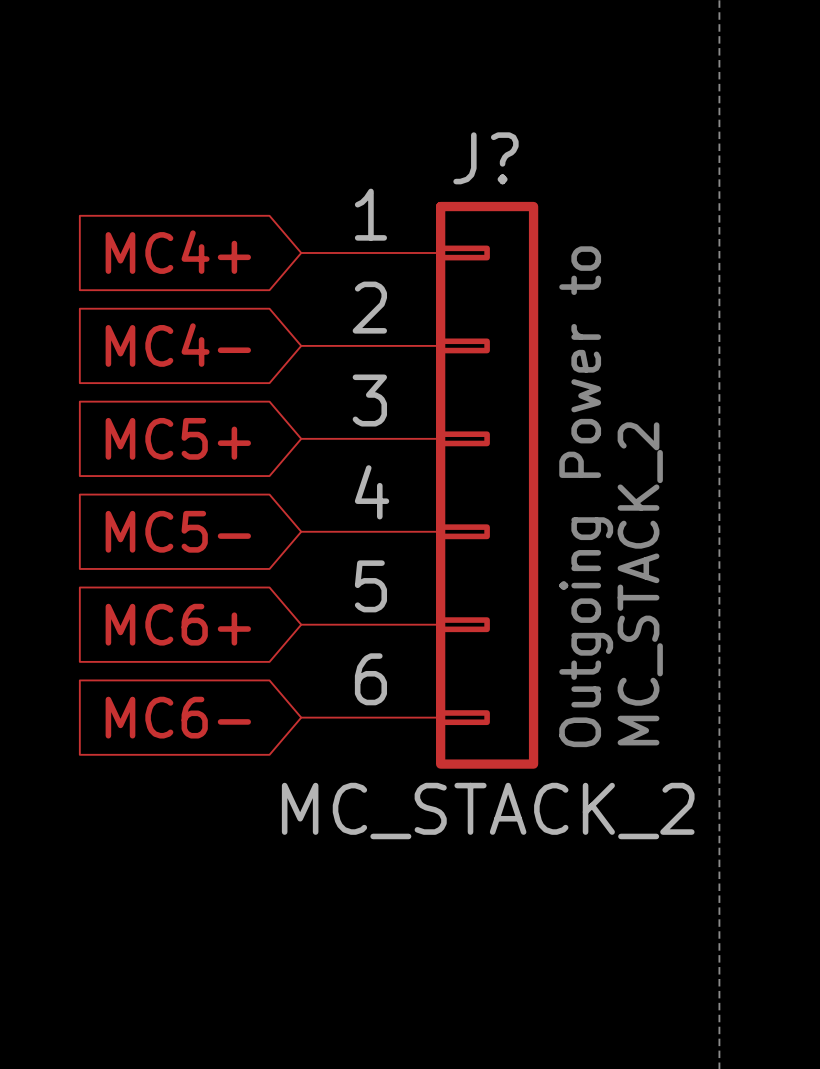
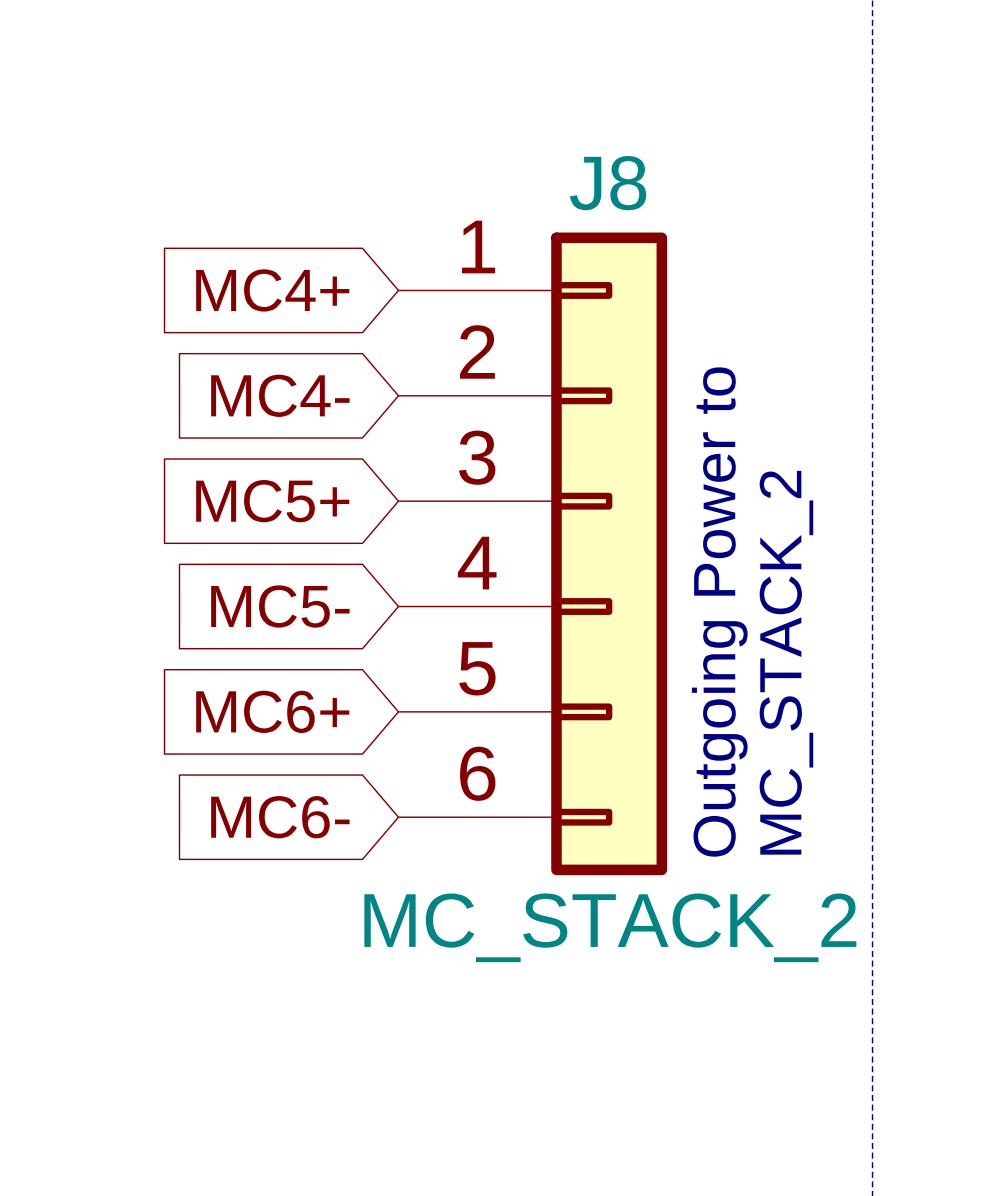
J? name: J? (486, 158) -> J8 (608, 183)

